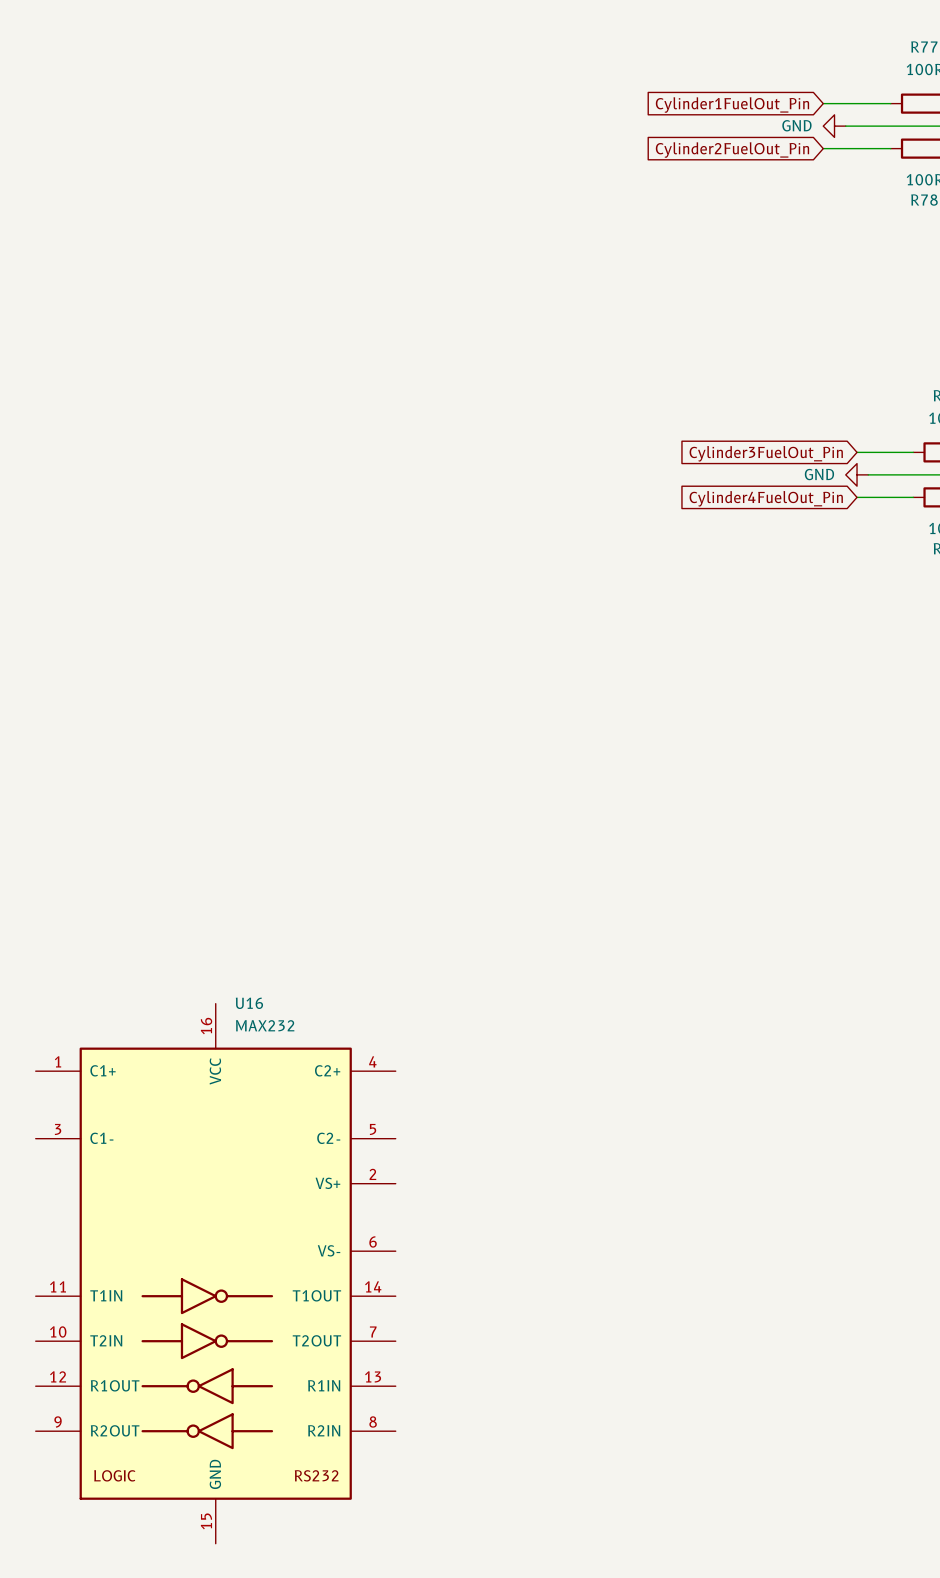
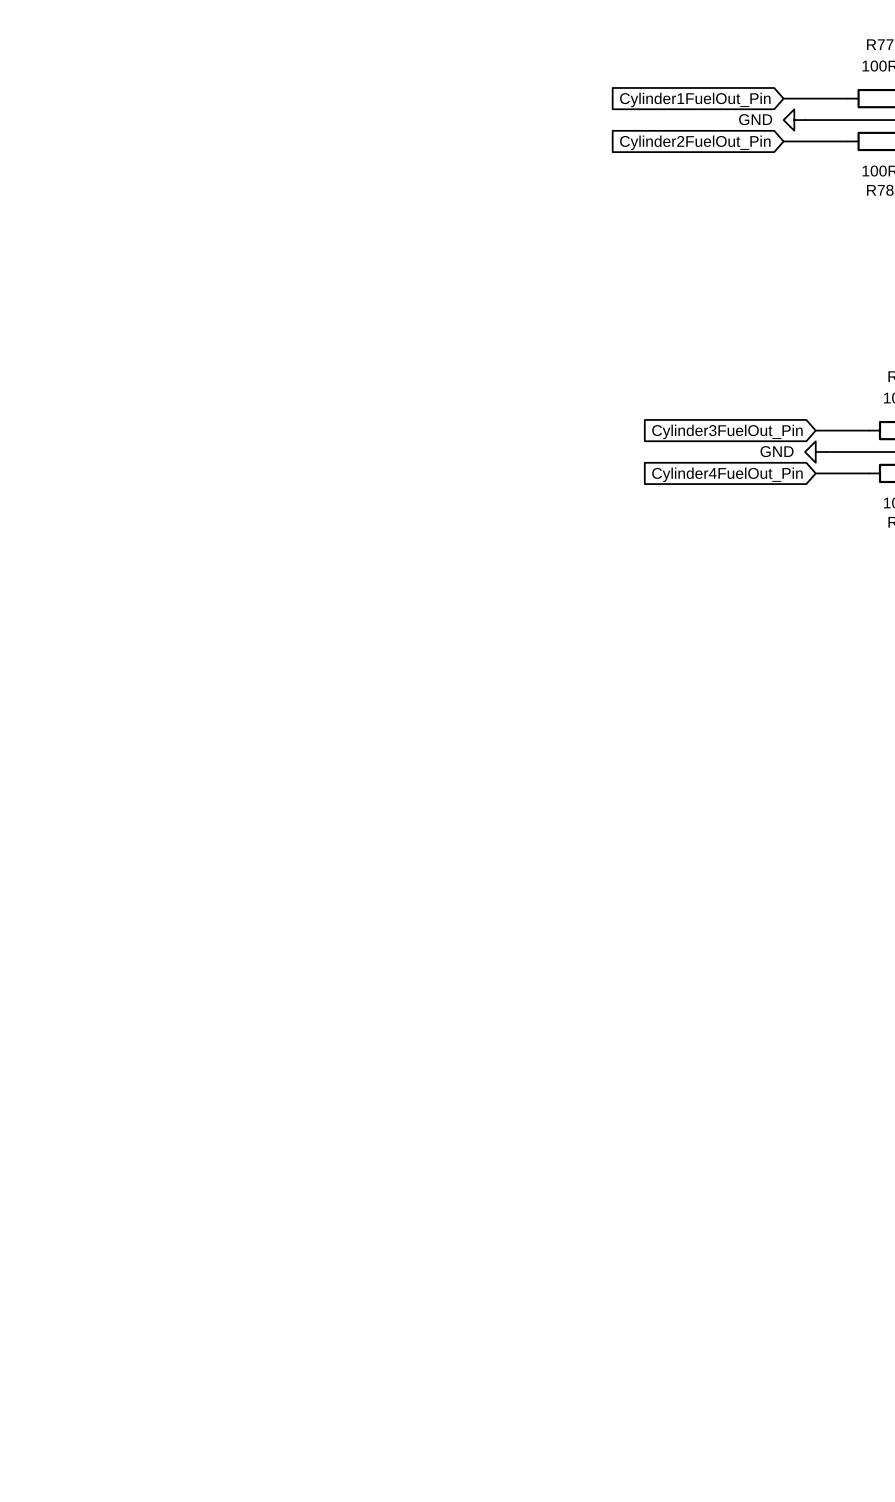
U16: MAX232 (215, 1273) -> none

